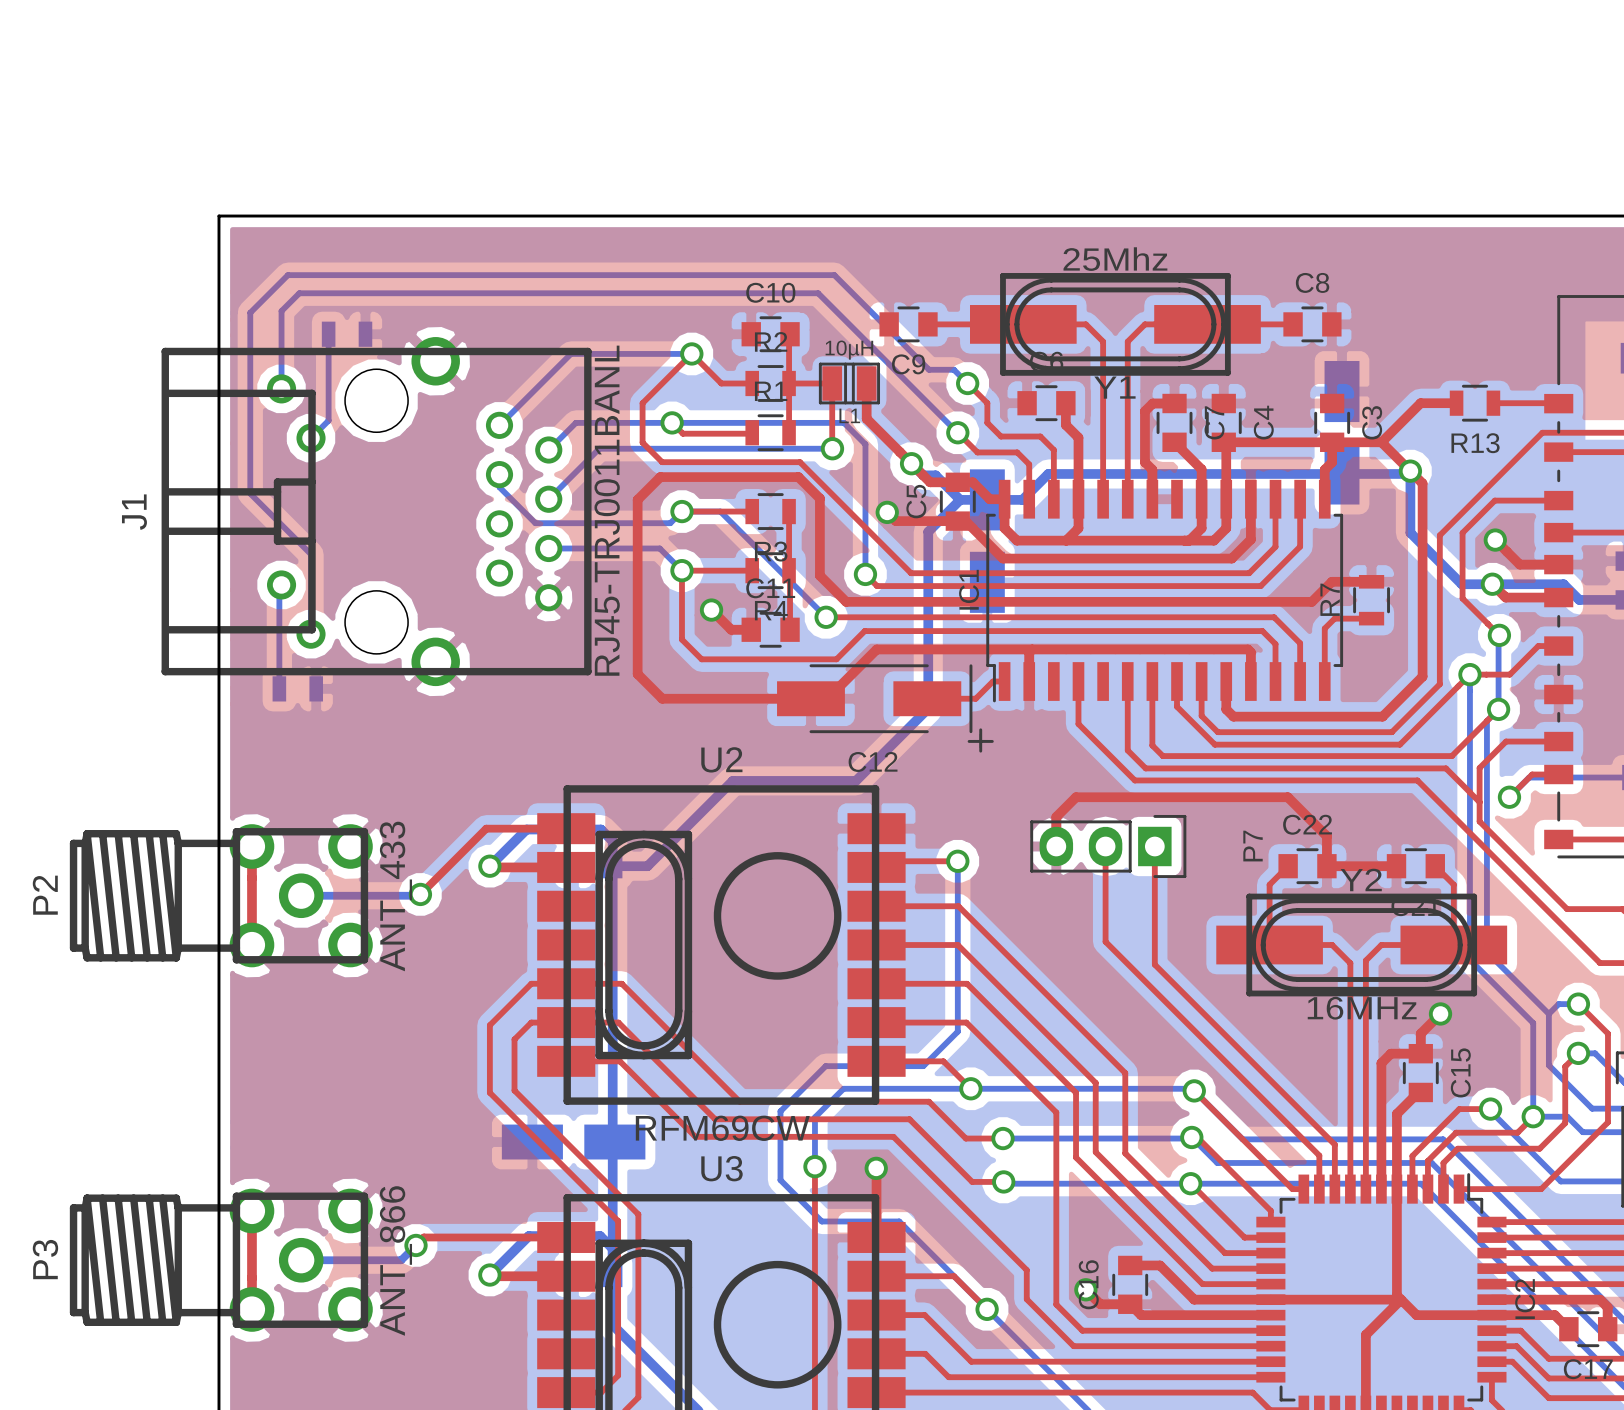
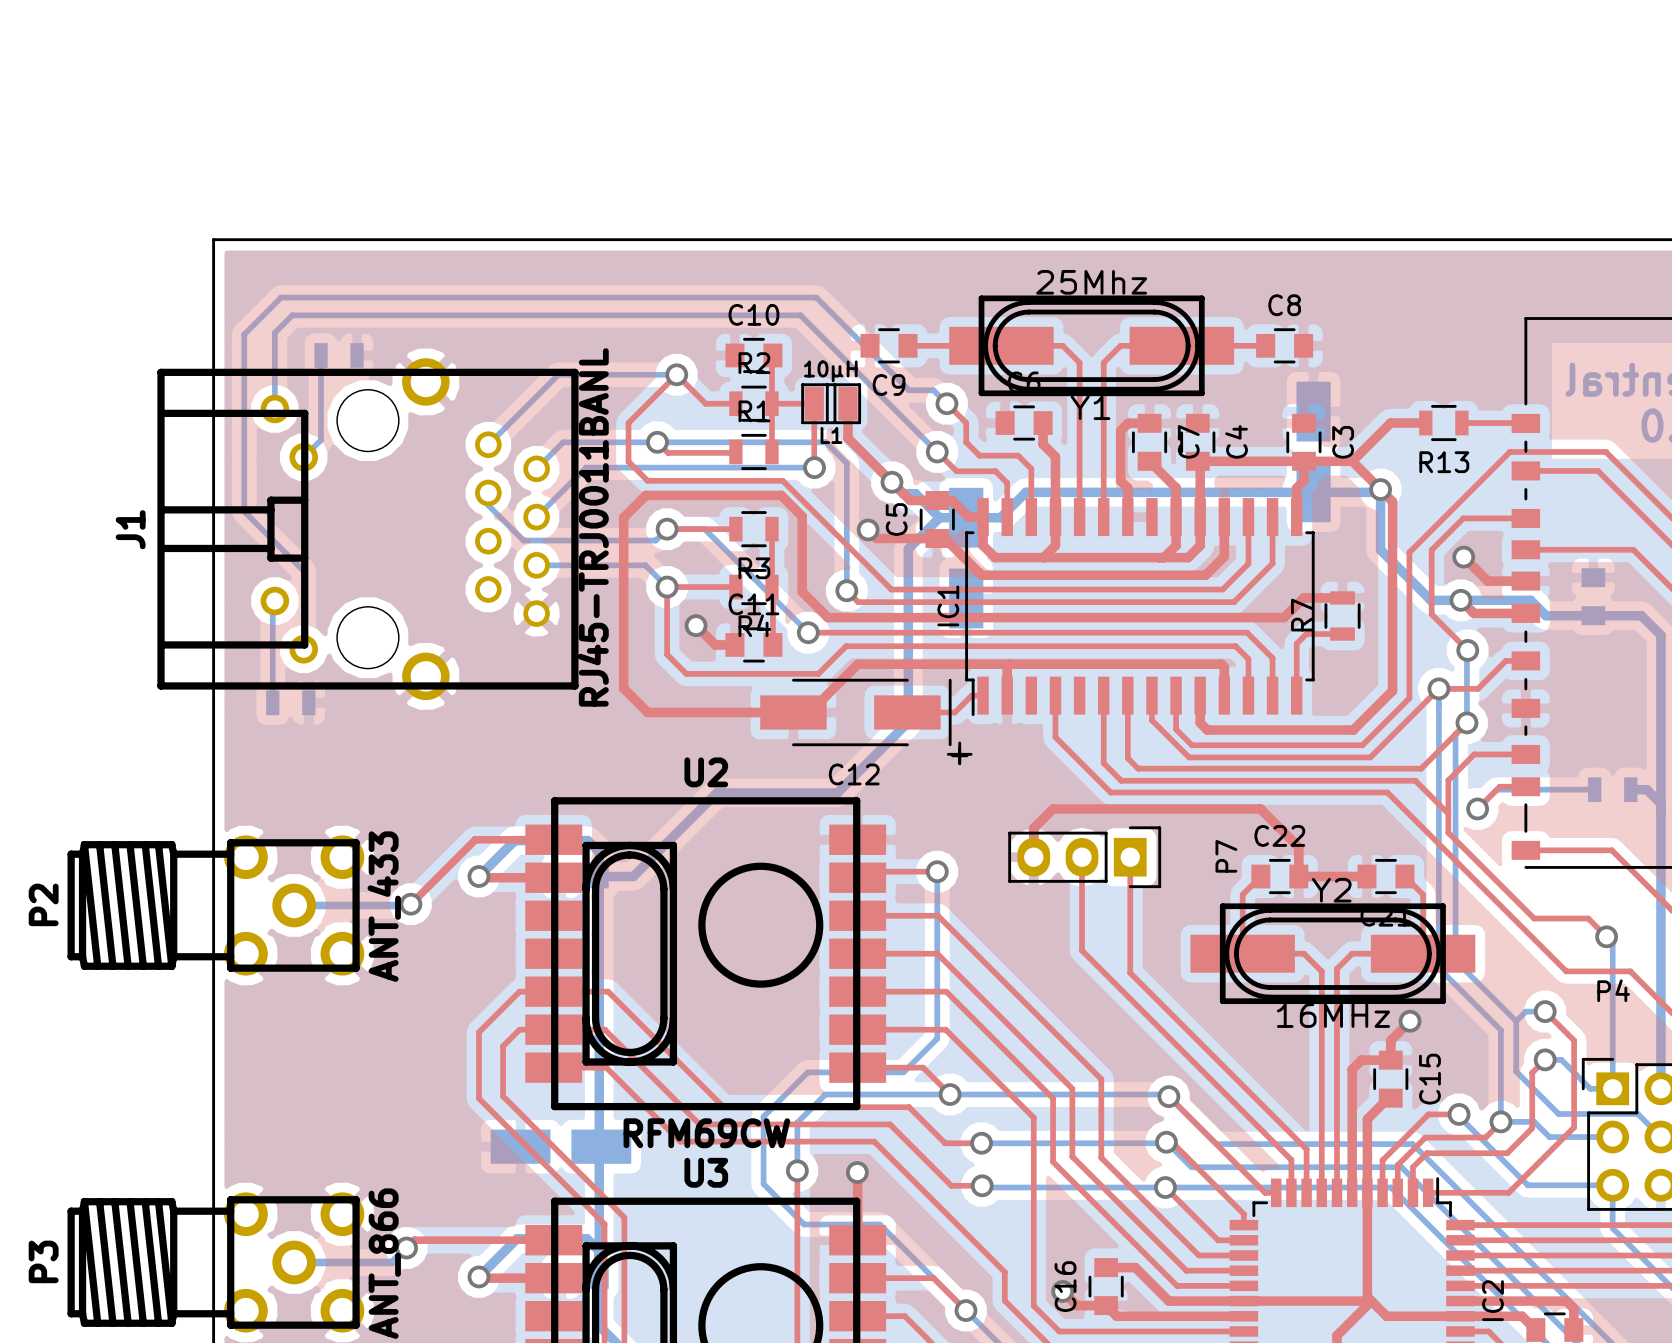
top track: (251, 846) (251, 945) -> none
top track: (251, 1210) (251, 1309) -> none

